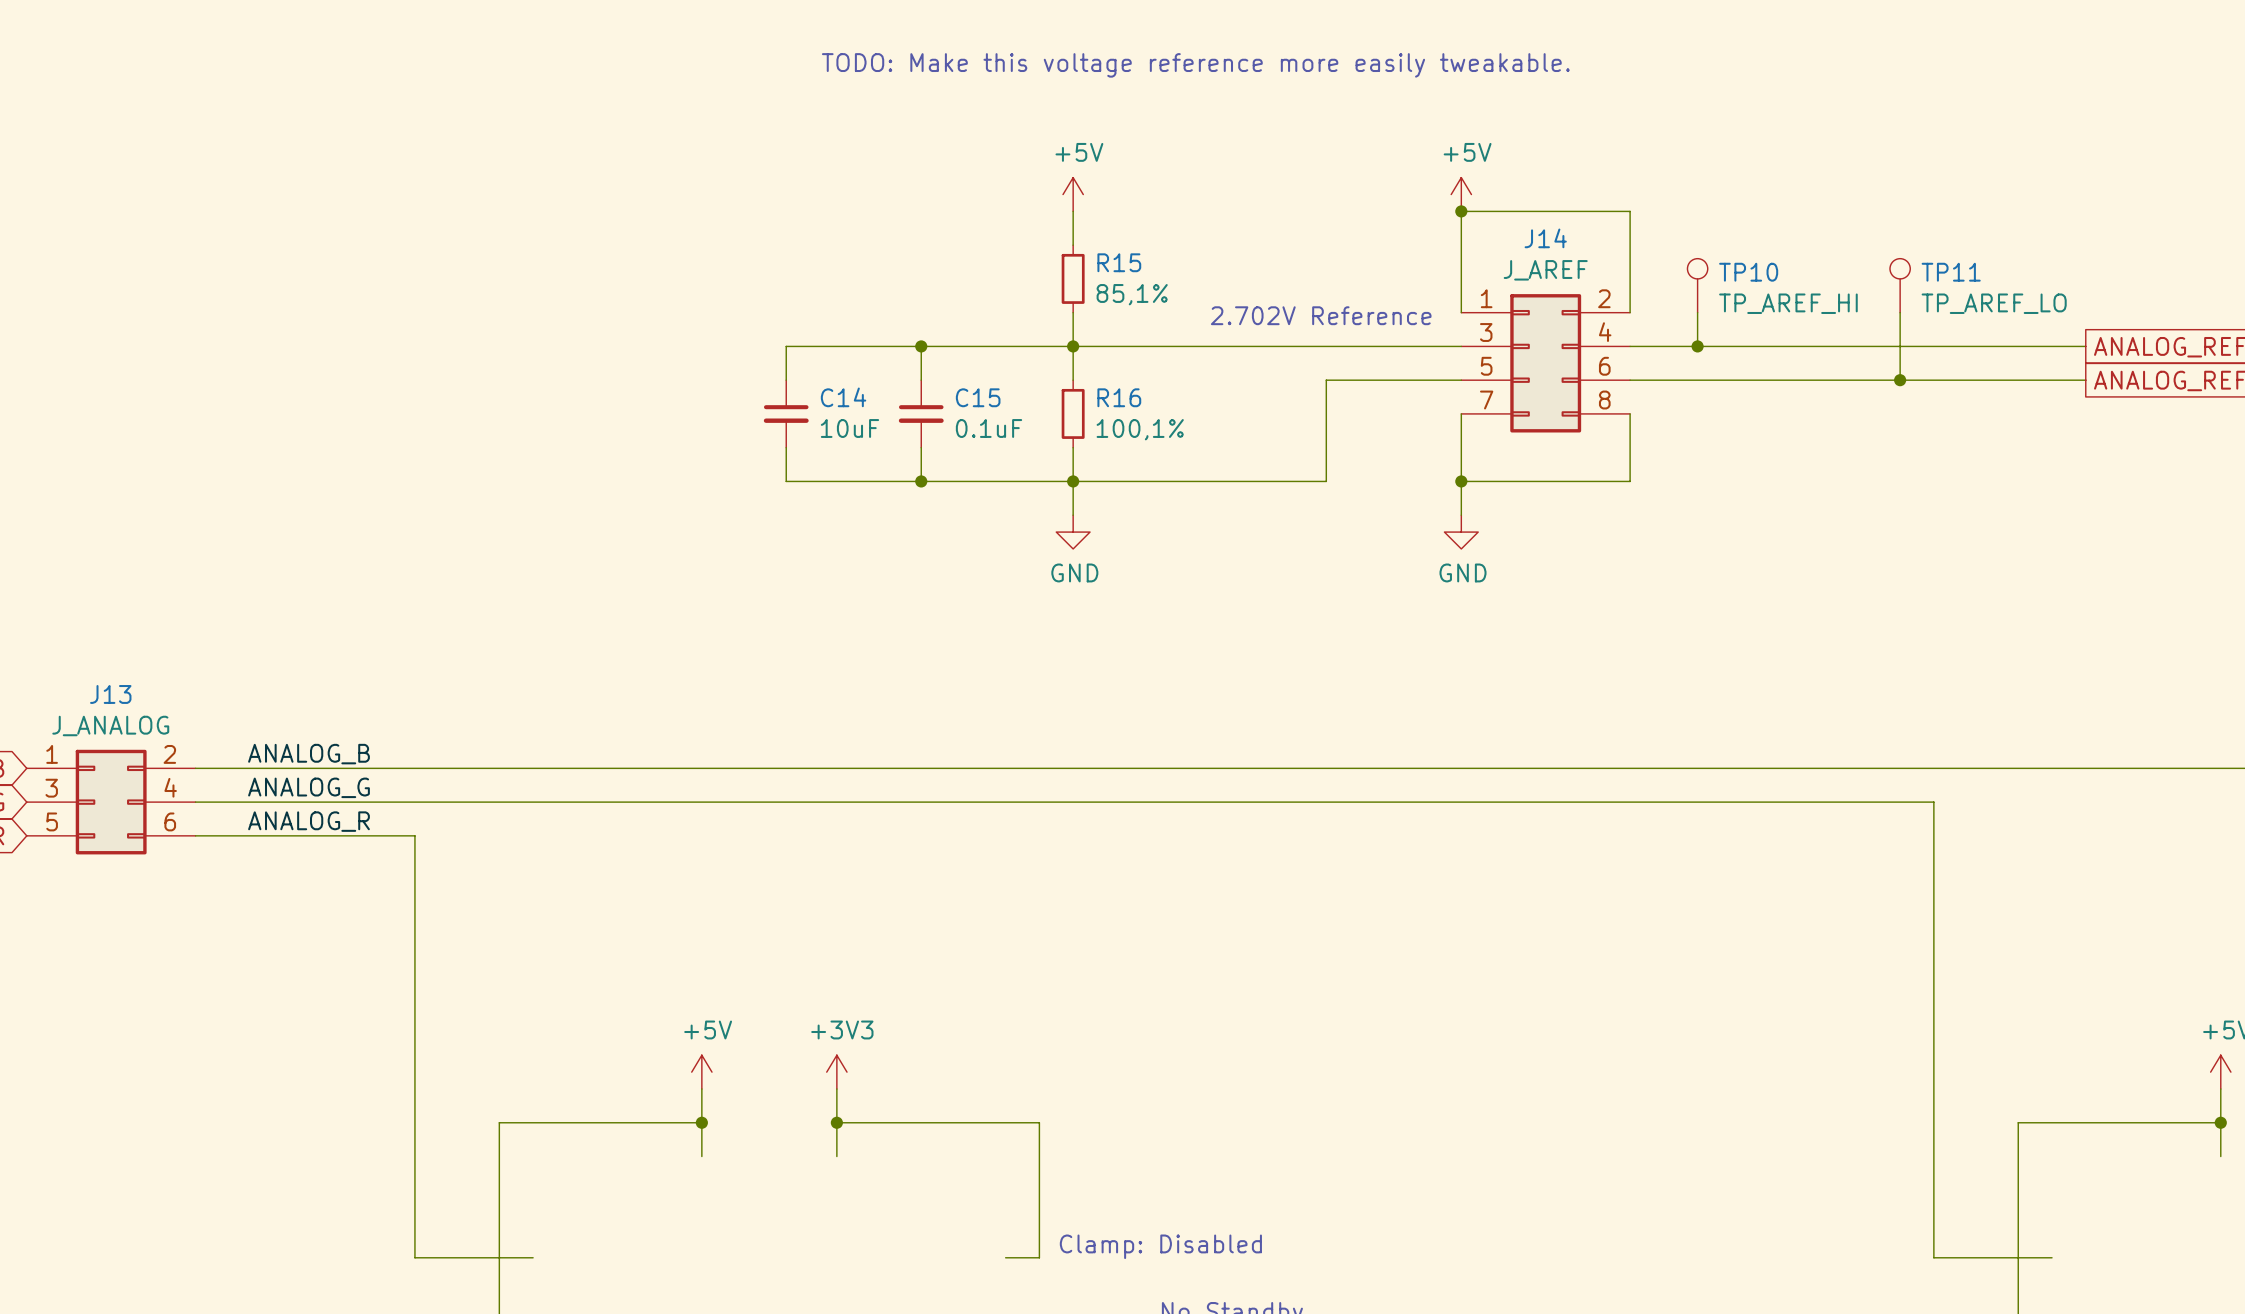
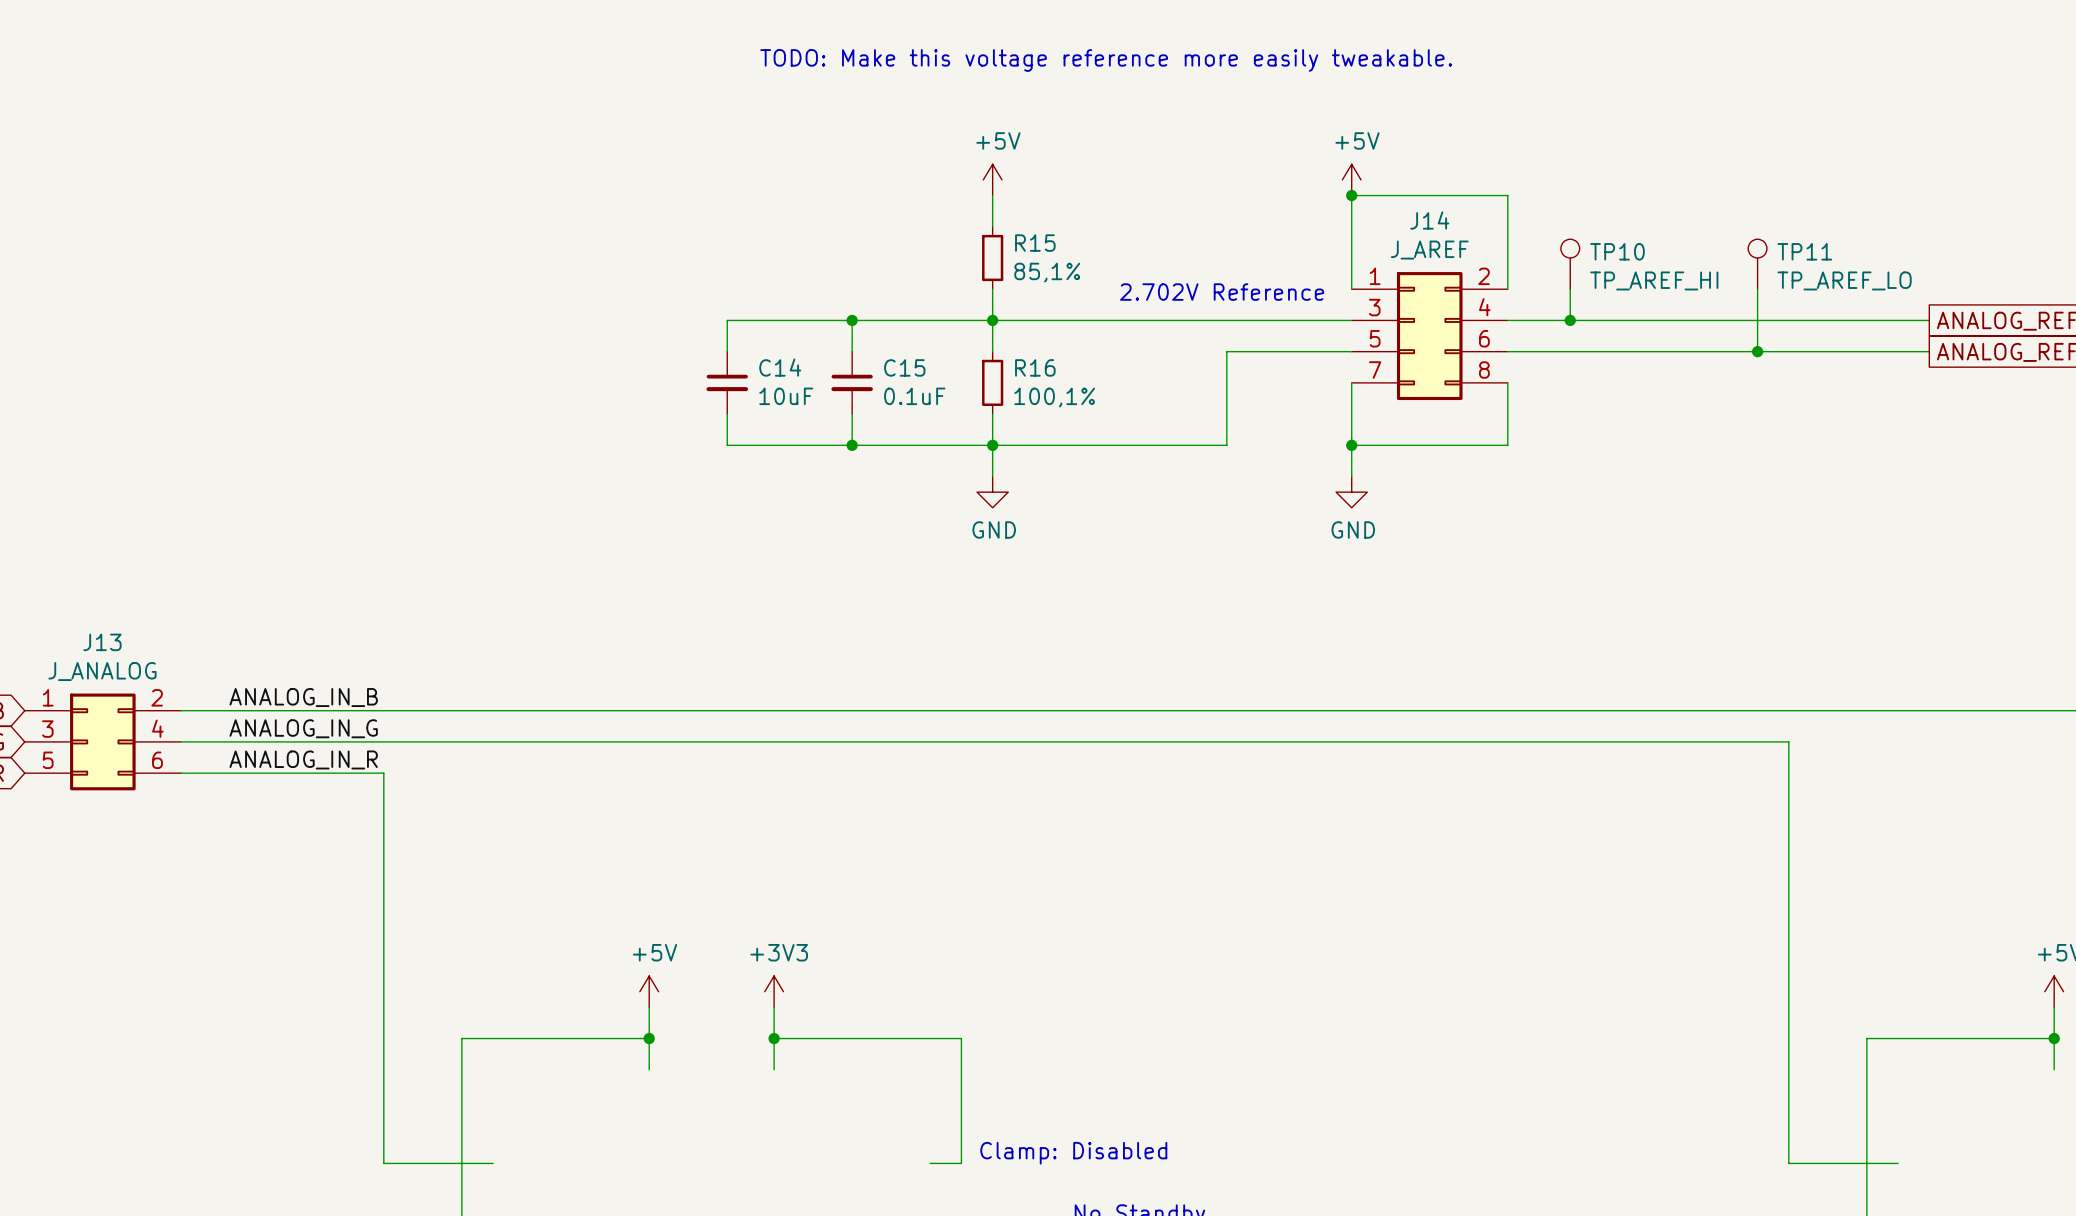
label: ANALOG_B (309, 754) -> ANALOG_IN_B (303, 697)
label: ANALOG_G (309, 787) -> ANALOG_IN_G (303, 728)
label: ANALOG_R (309, 821) -> ANALOG_IN_R (303, 759)

